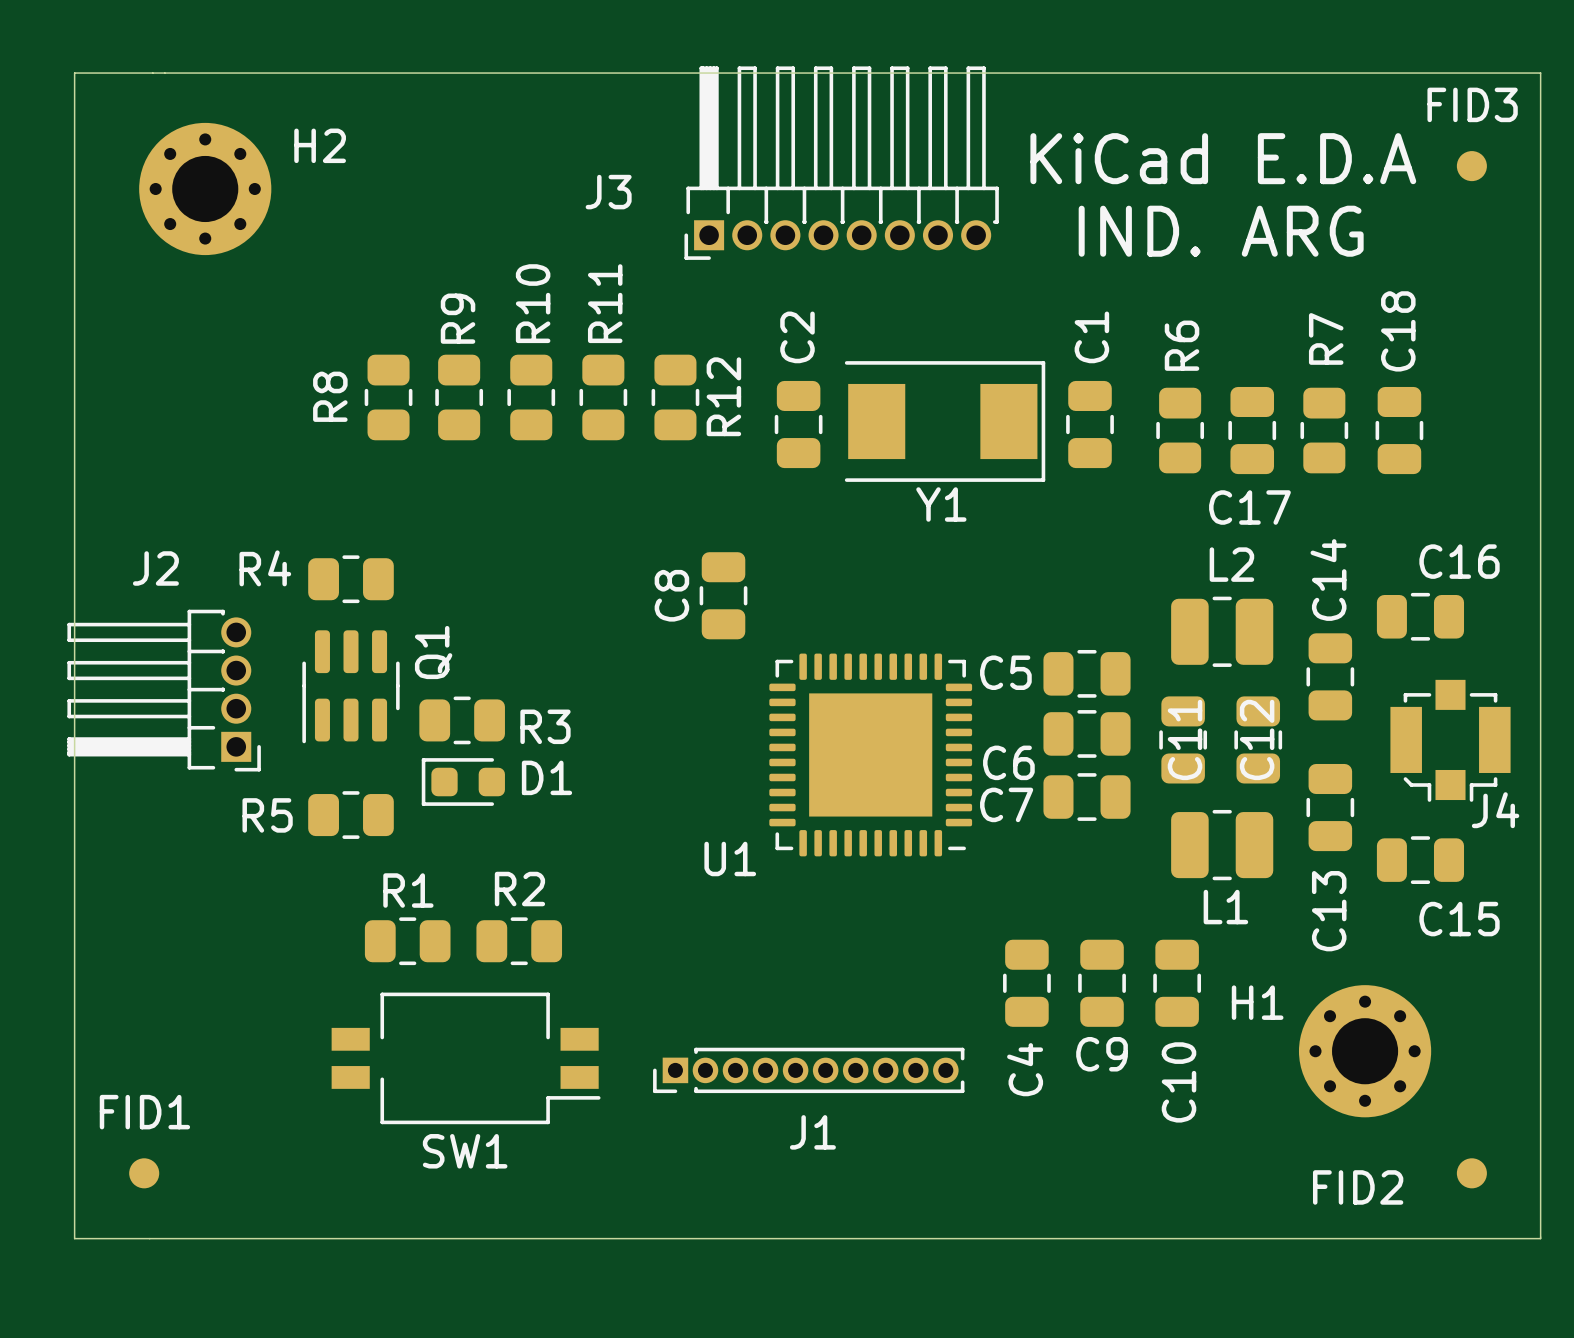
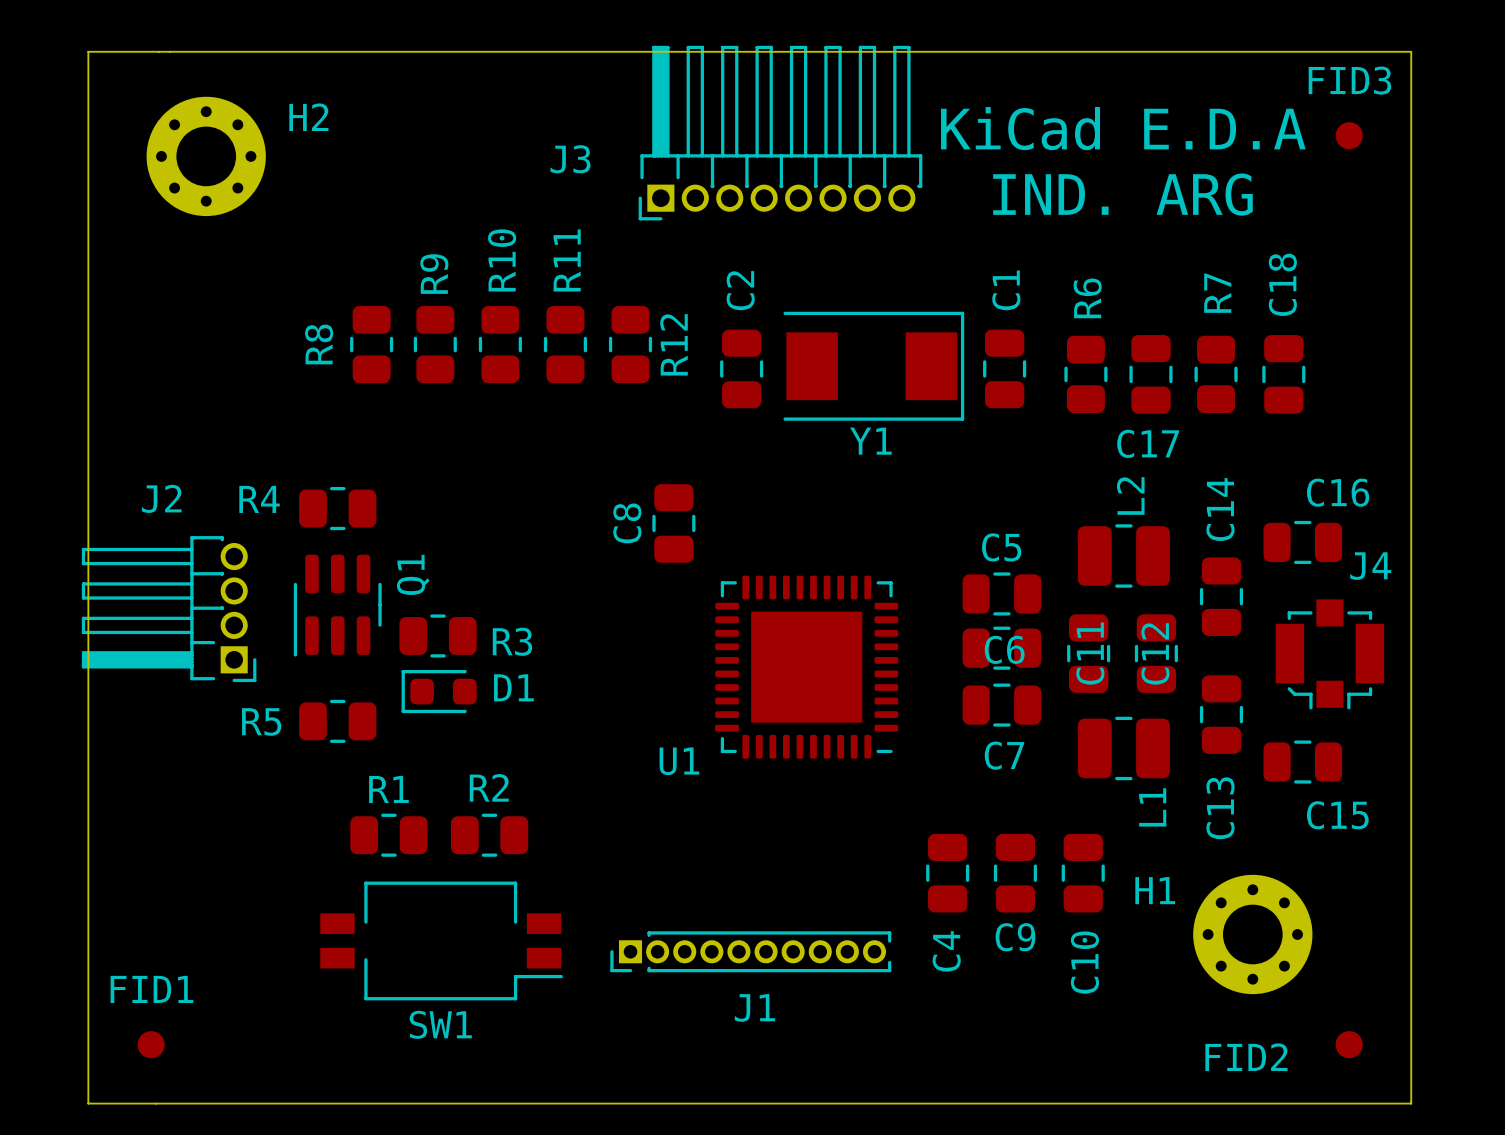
L2 name rotation: 0° (1231, 564) -> 90° counterclockwise (1130, 495)
C5 name position: C5 (1005, 672) -> C5 (1001, 547)
C6 name position: C6 (1008, 762) -> C6 (1004, 649)
C7 name position: C7 (1006, 804) -> C7 (1004, 755)
J4 name position: J4 (1495, 810) -> J4 (1370, 566)
L1 name rotation: 0° (1225, 907) -> 90° counterclockwise (1152, 807)

